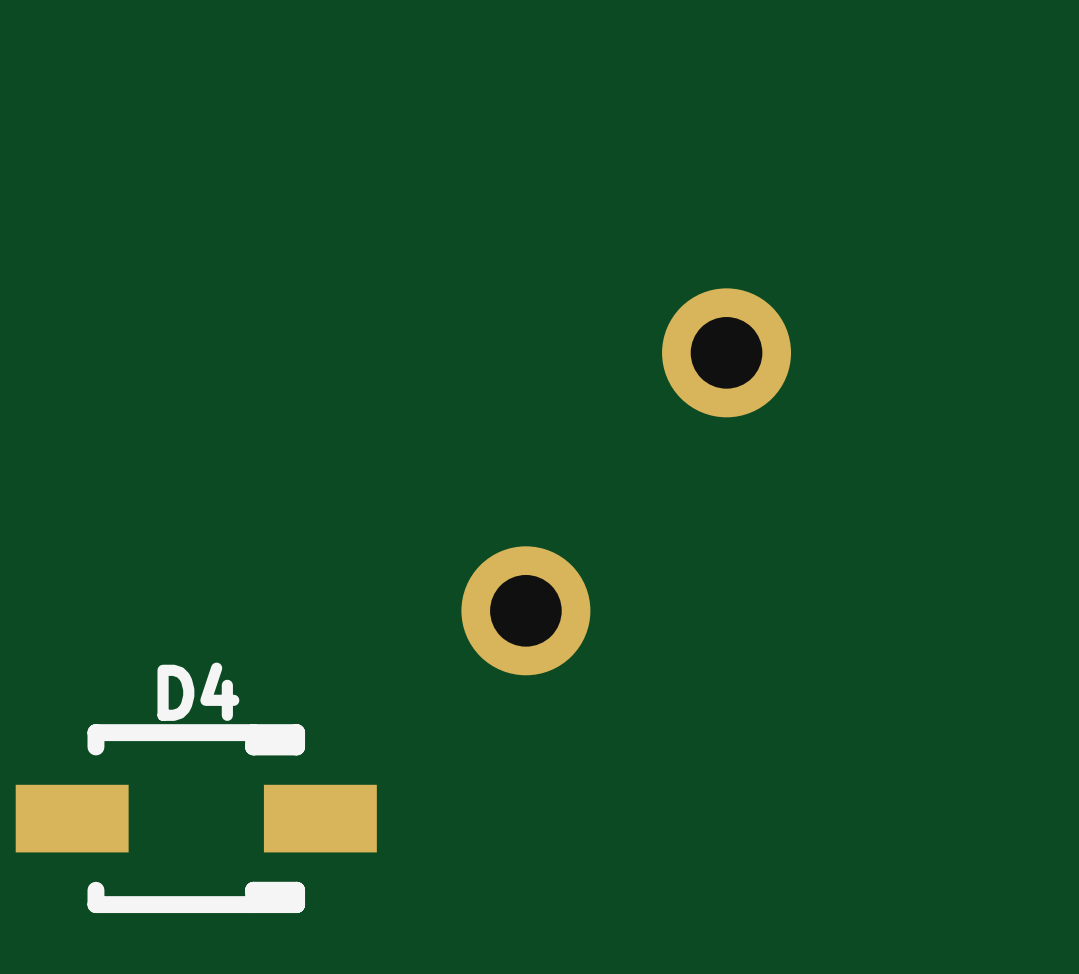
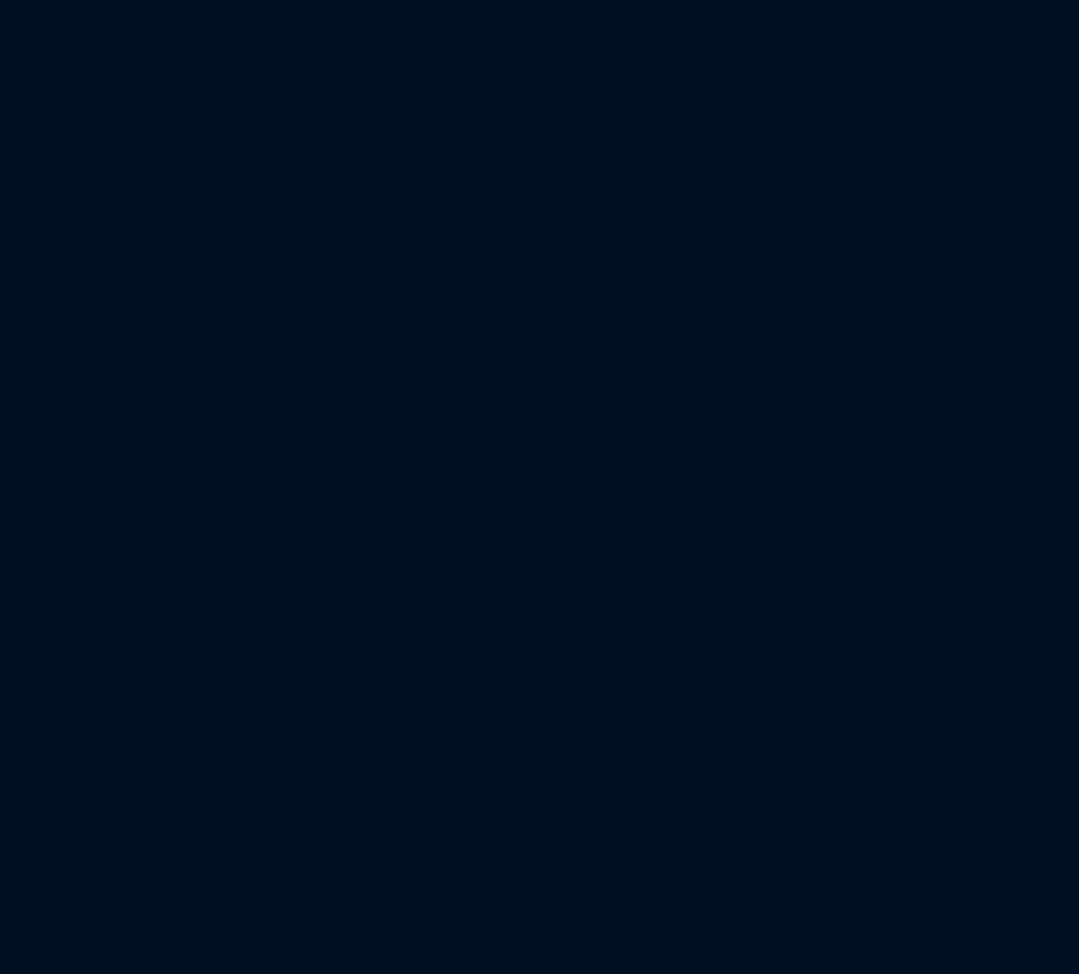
part: (726, 352) -> none
part: (525, 610) -> none
D4: (196, 818) -> none

